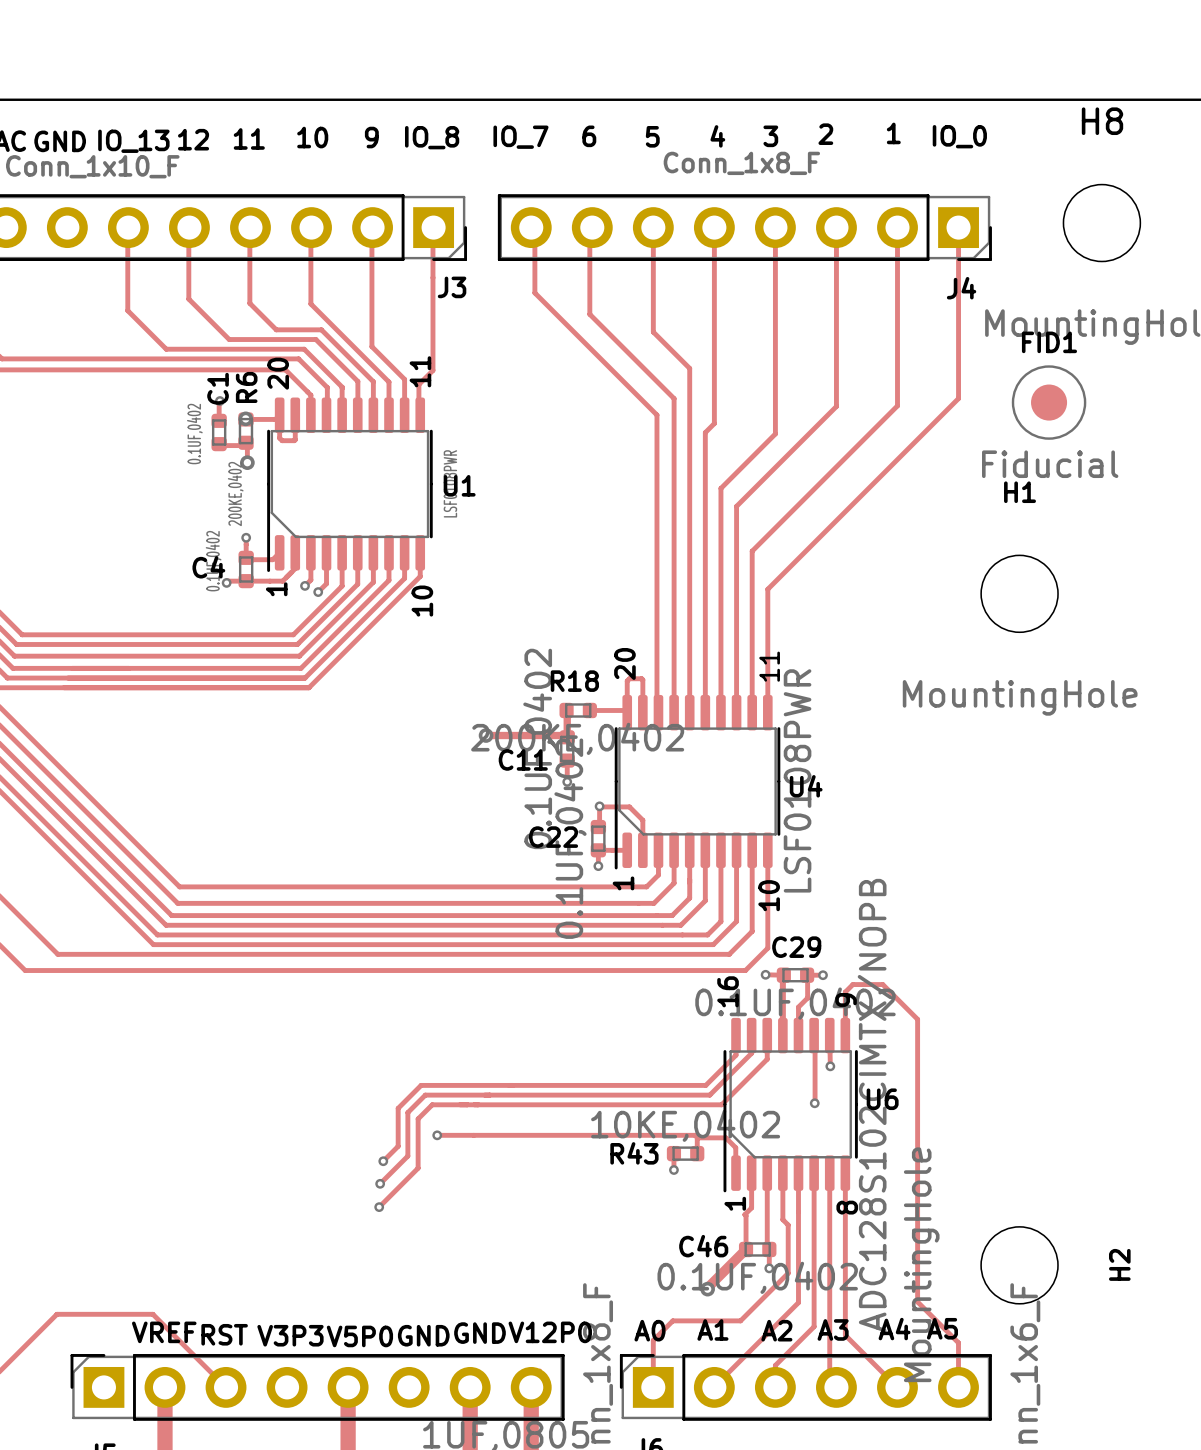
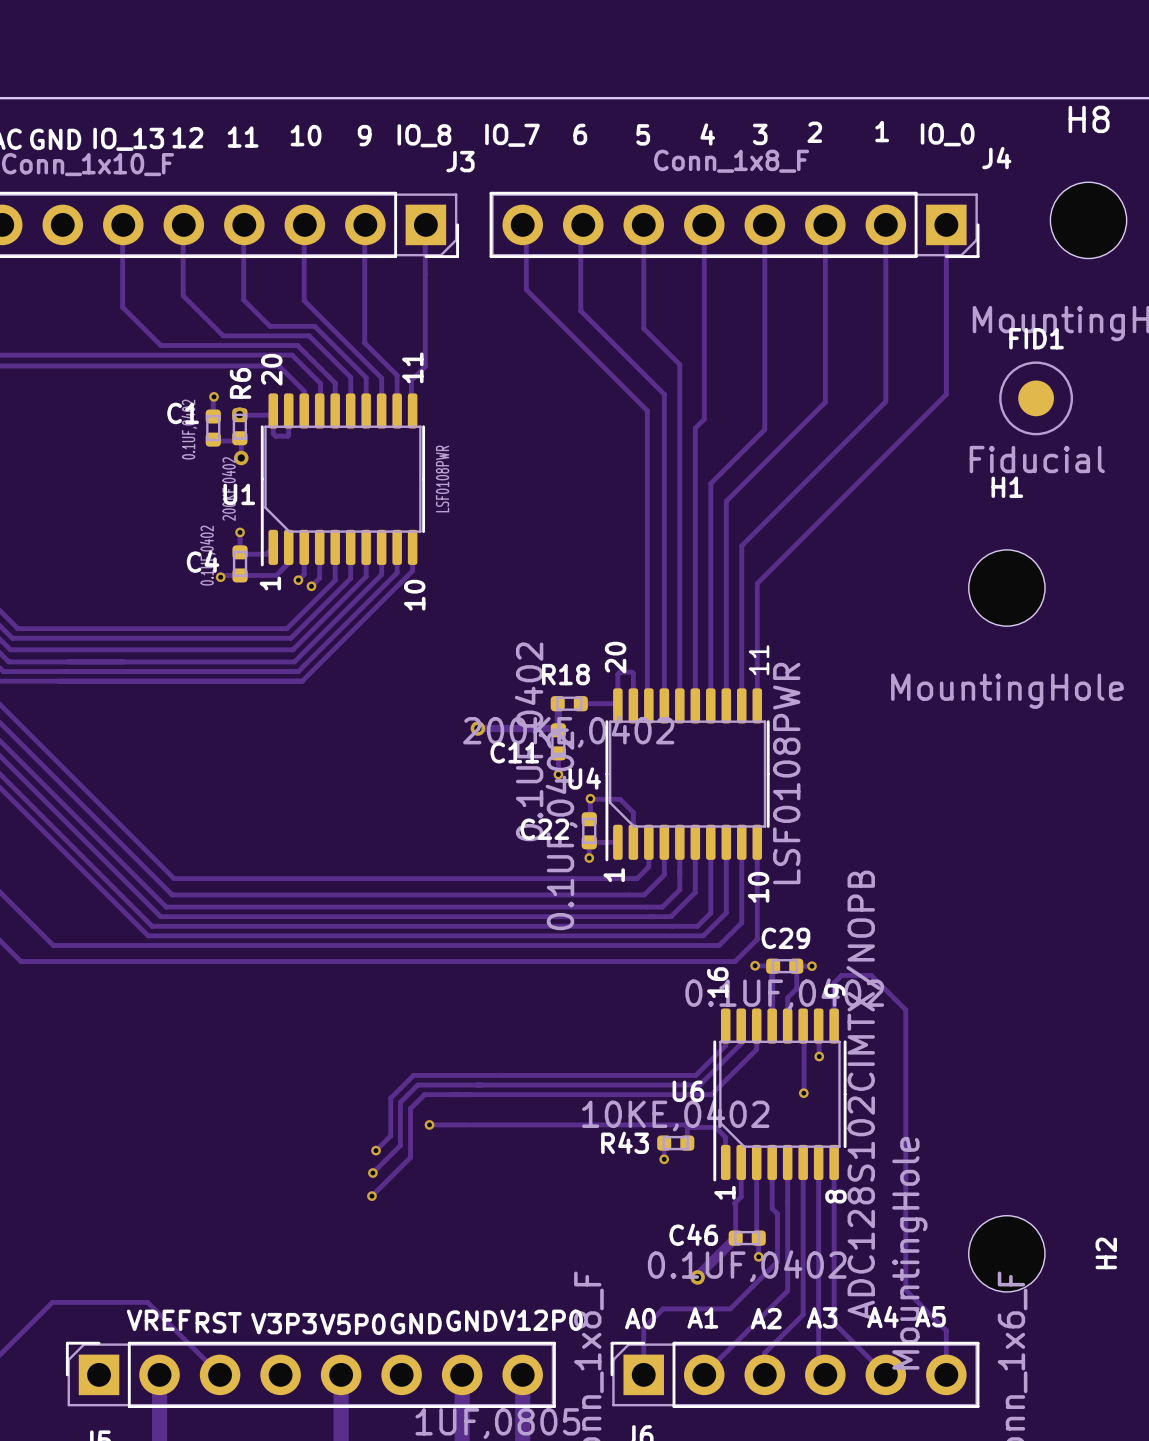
J3 name position: J3 (452, 287) -> J3 (460, 161)
J4 name position: J4 (961, 288) -> J4 (996, 158)
C1 name rotation: 0° (218, 388) -> 90° clockwise (183, 413)
U1 name position: U1 (459, 485) -> U1 (239, 494)
U4 name position: U4 (806, 786) -> U4 (584, 778)
U6 name position: U6 (882, 1099) -> U6 (688, 1091)

